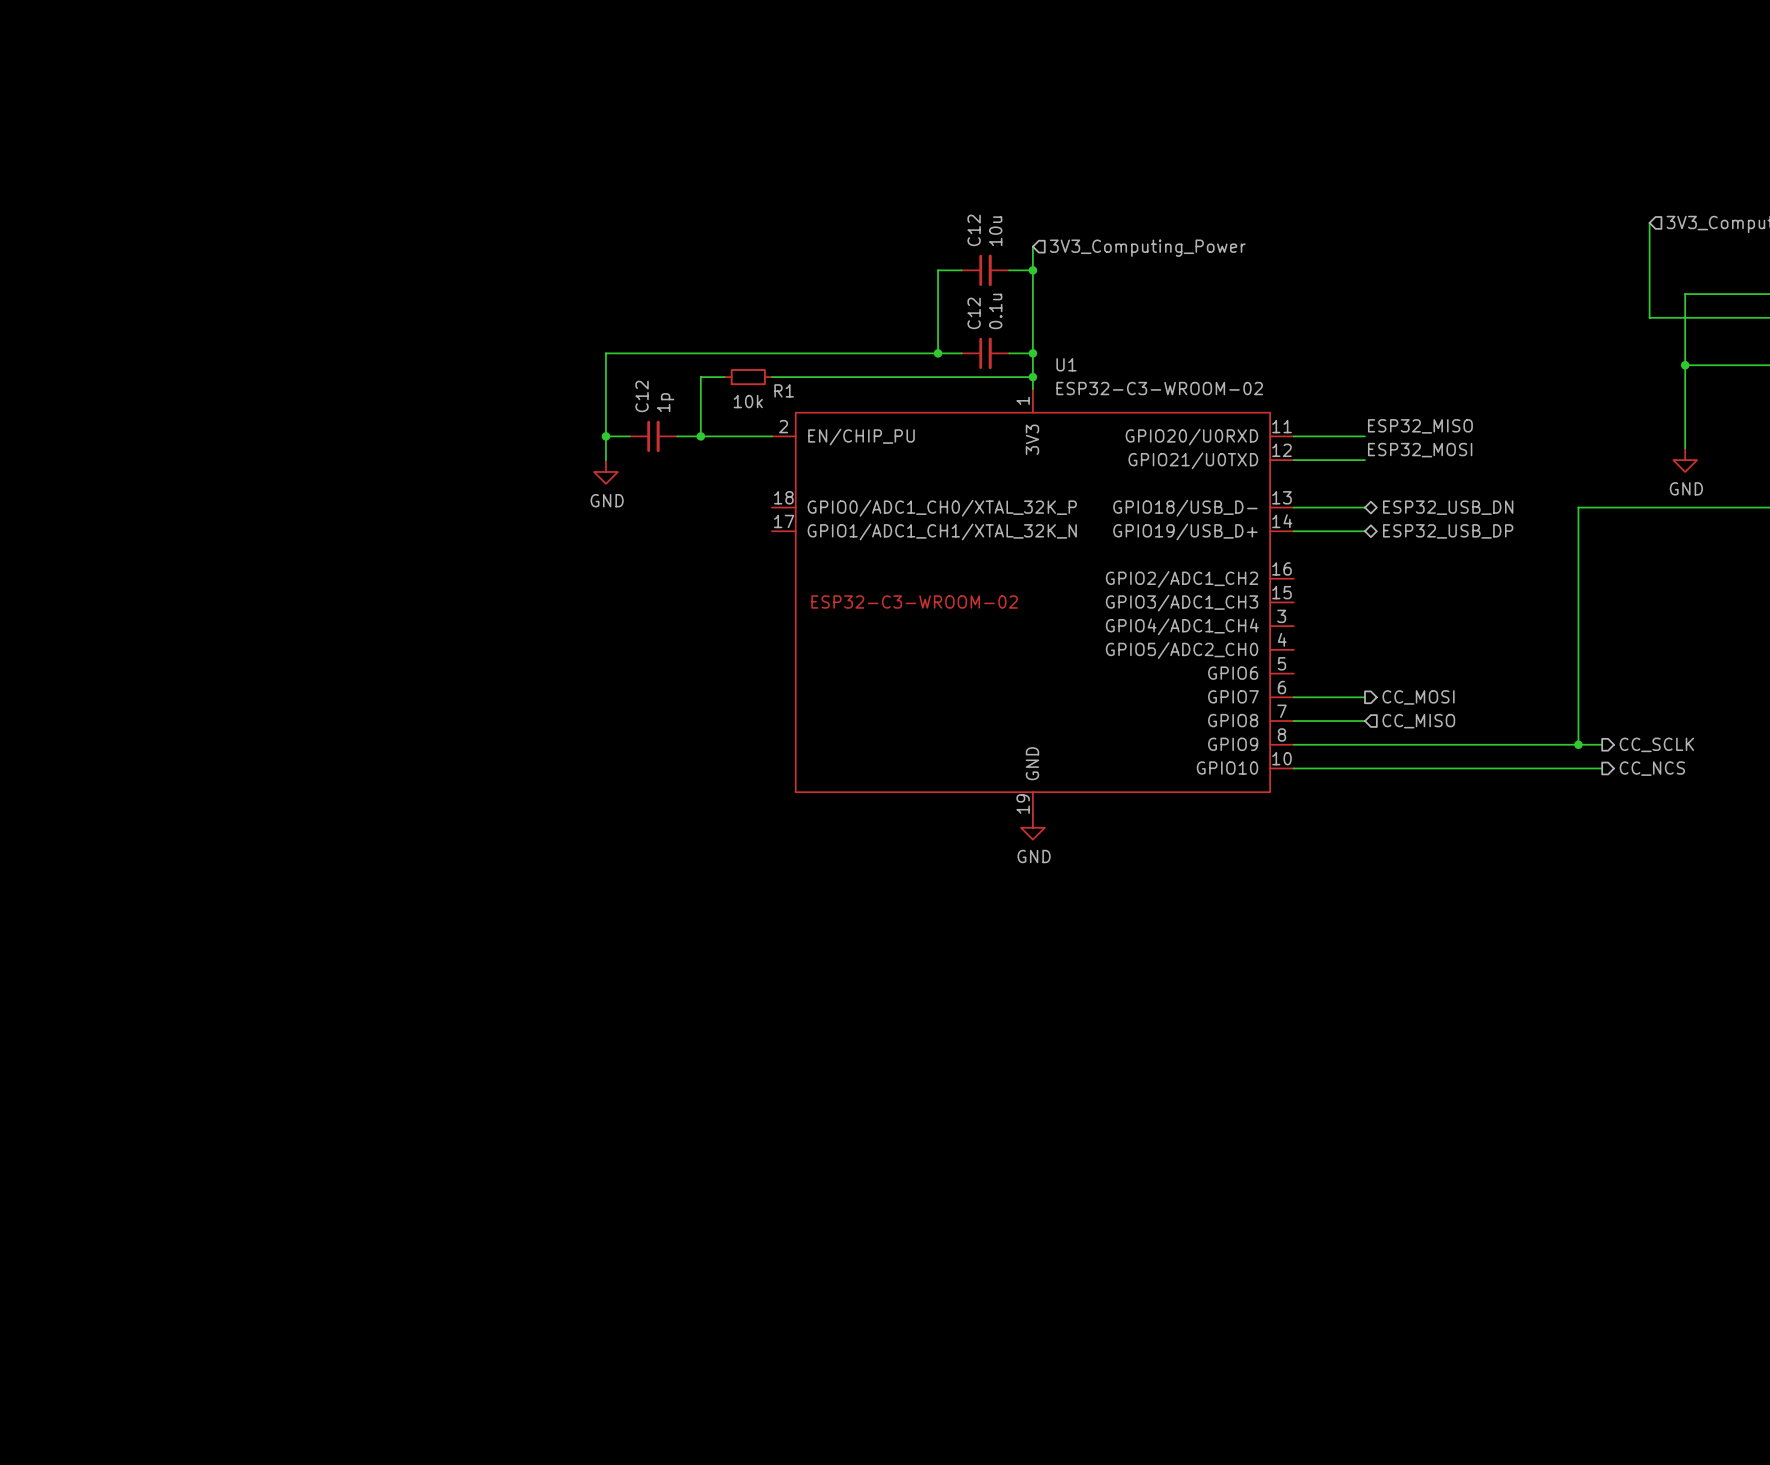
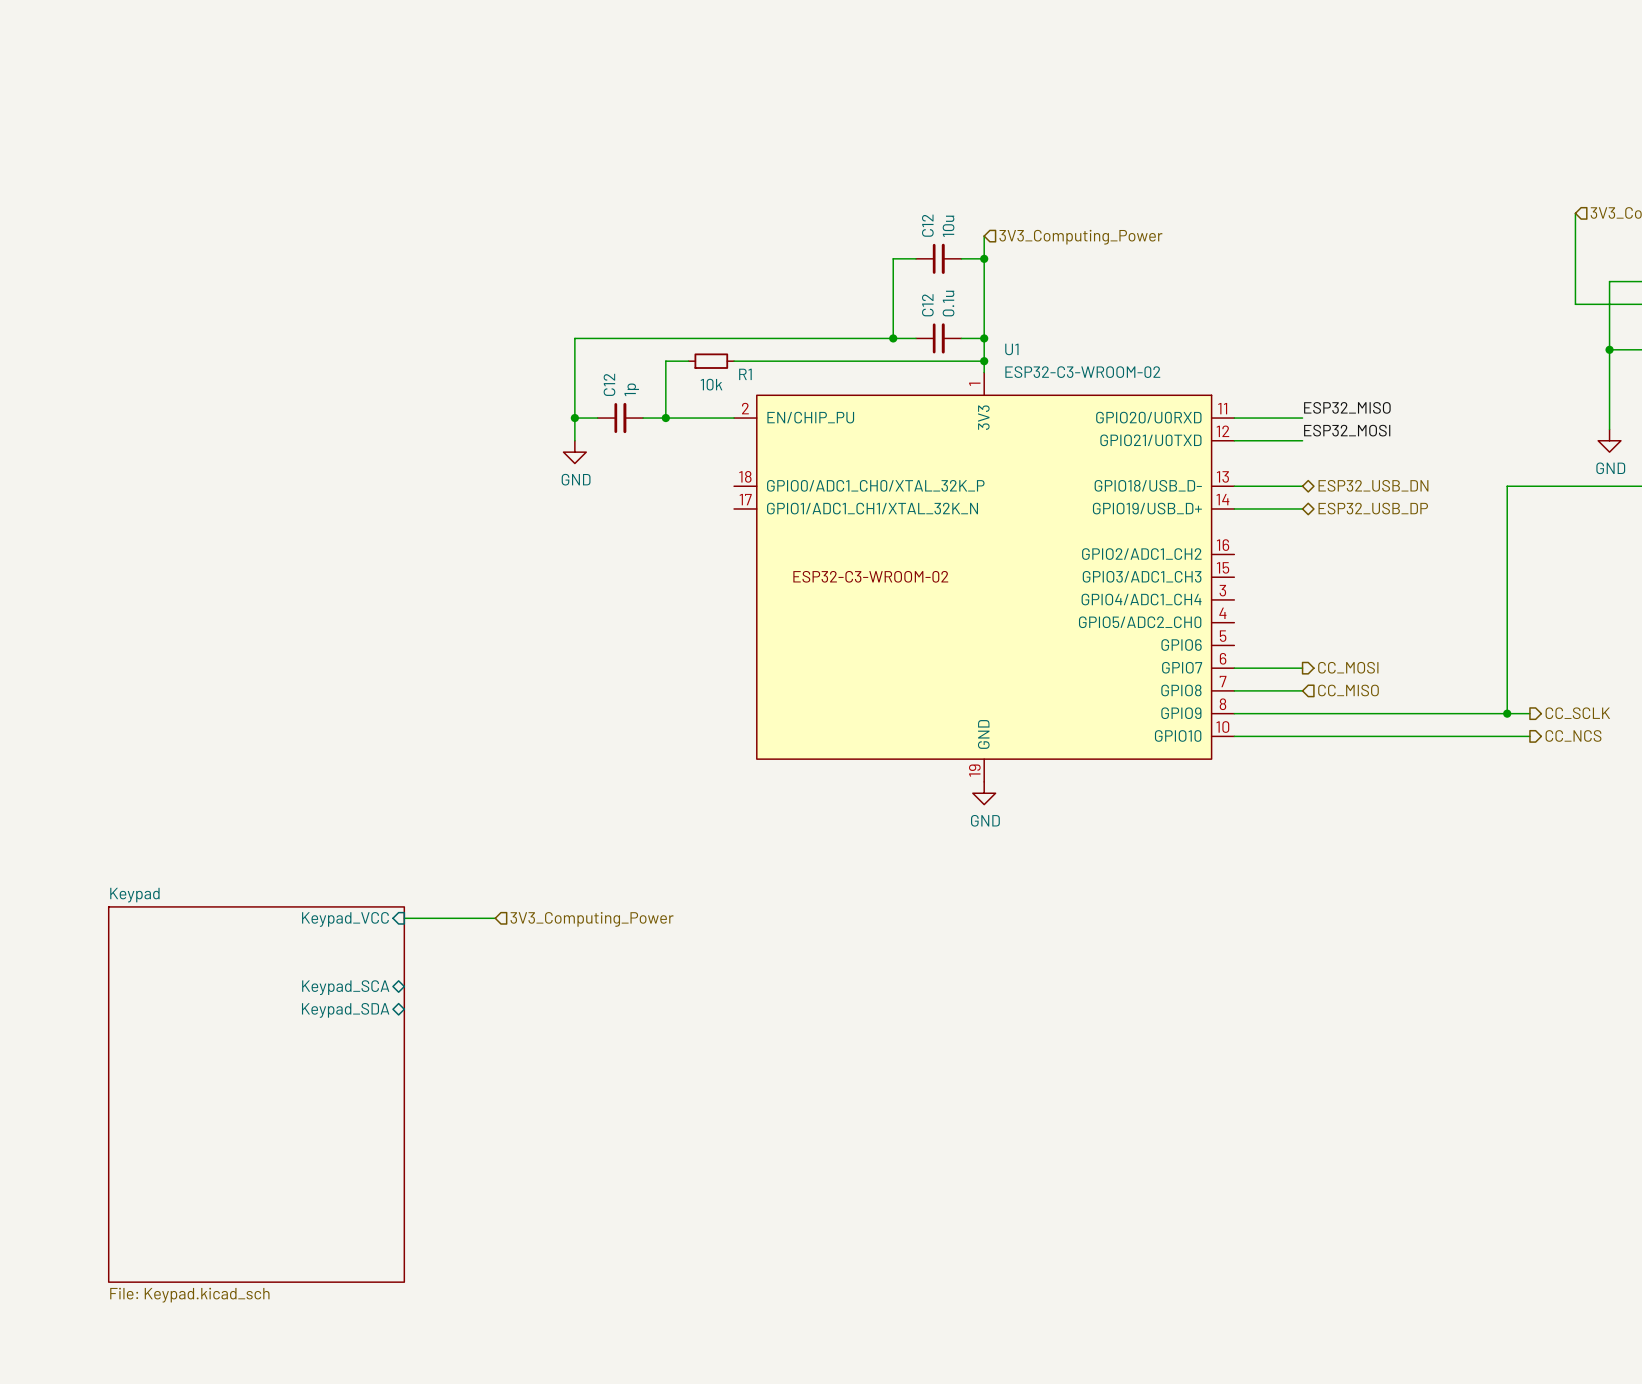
wire: none -> (404, 918) (495, 918)
sheet pin: none -> Keypad_VCC (345, 919)
hierarchical label: none -> 3V3_Computing_Power (592, 919)
sheet pin: none -> Keypad_SCA (345, 987)
sheet pin: none -> Keypad_SDA (345, 1010)
sheet Keypad: none -> File: Keypad.kicad_sch (256, 1094)

